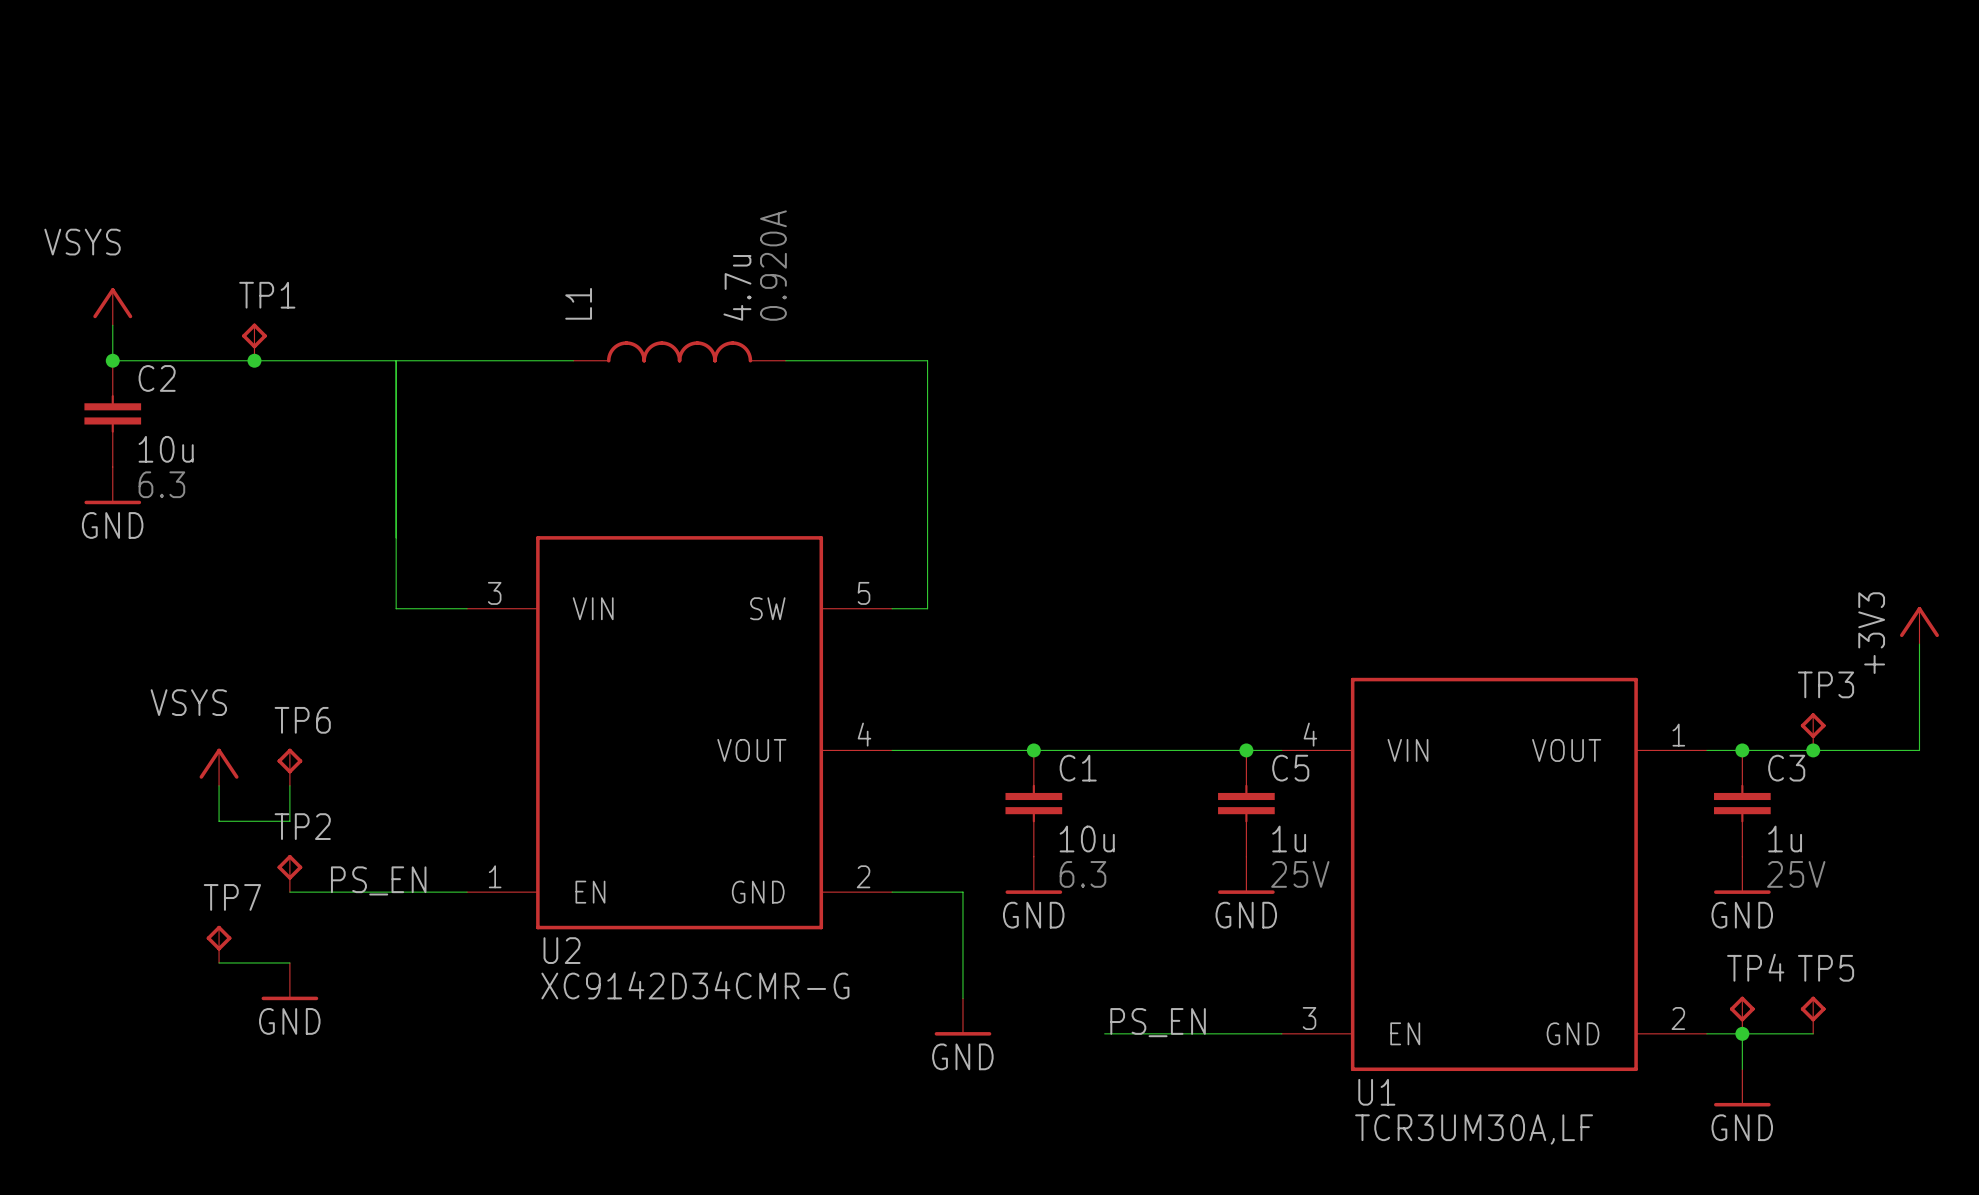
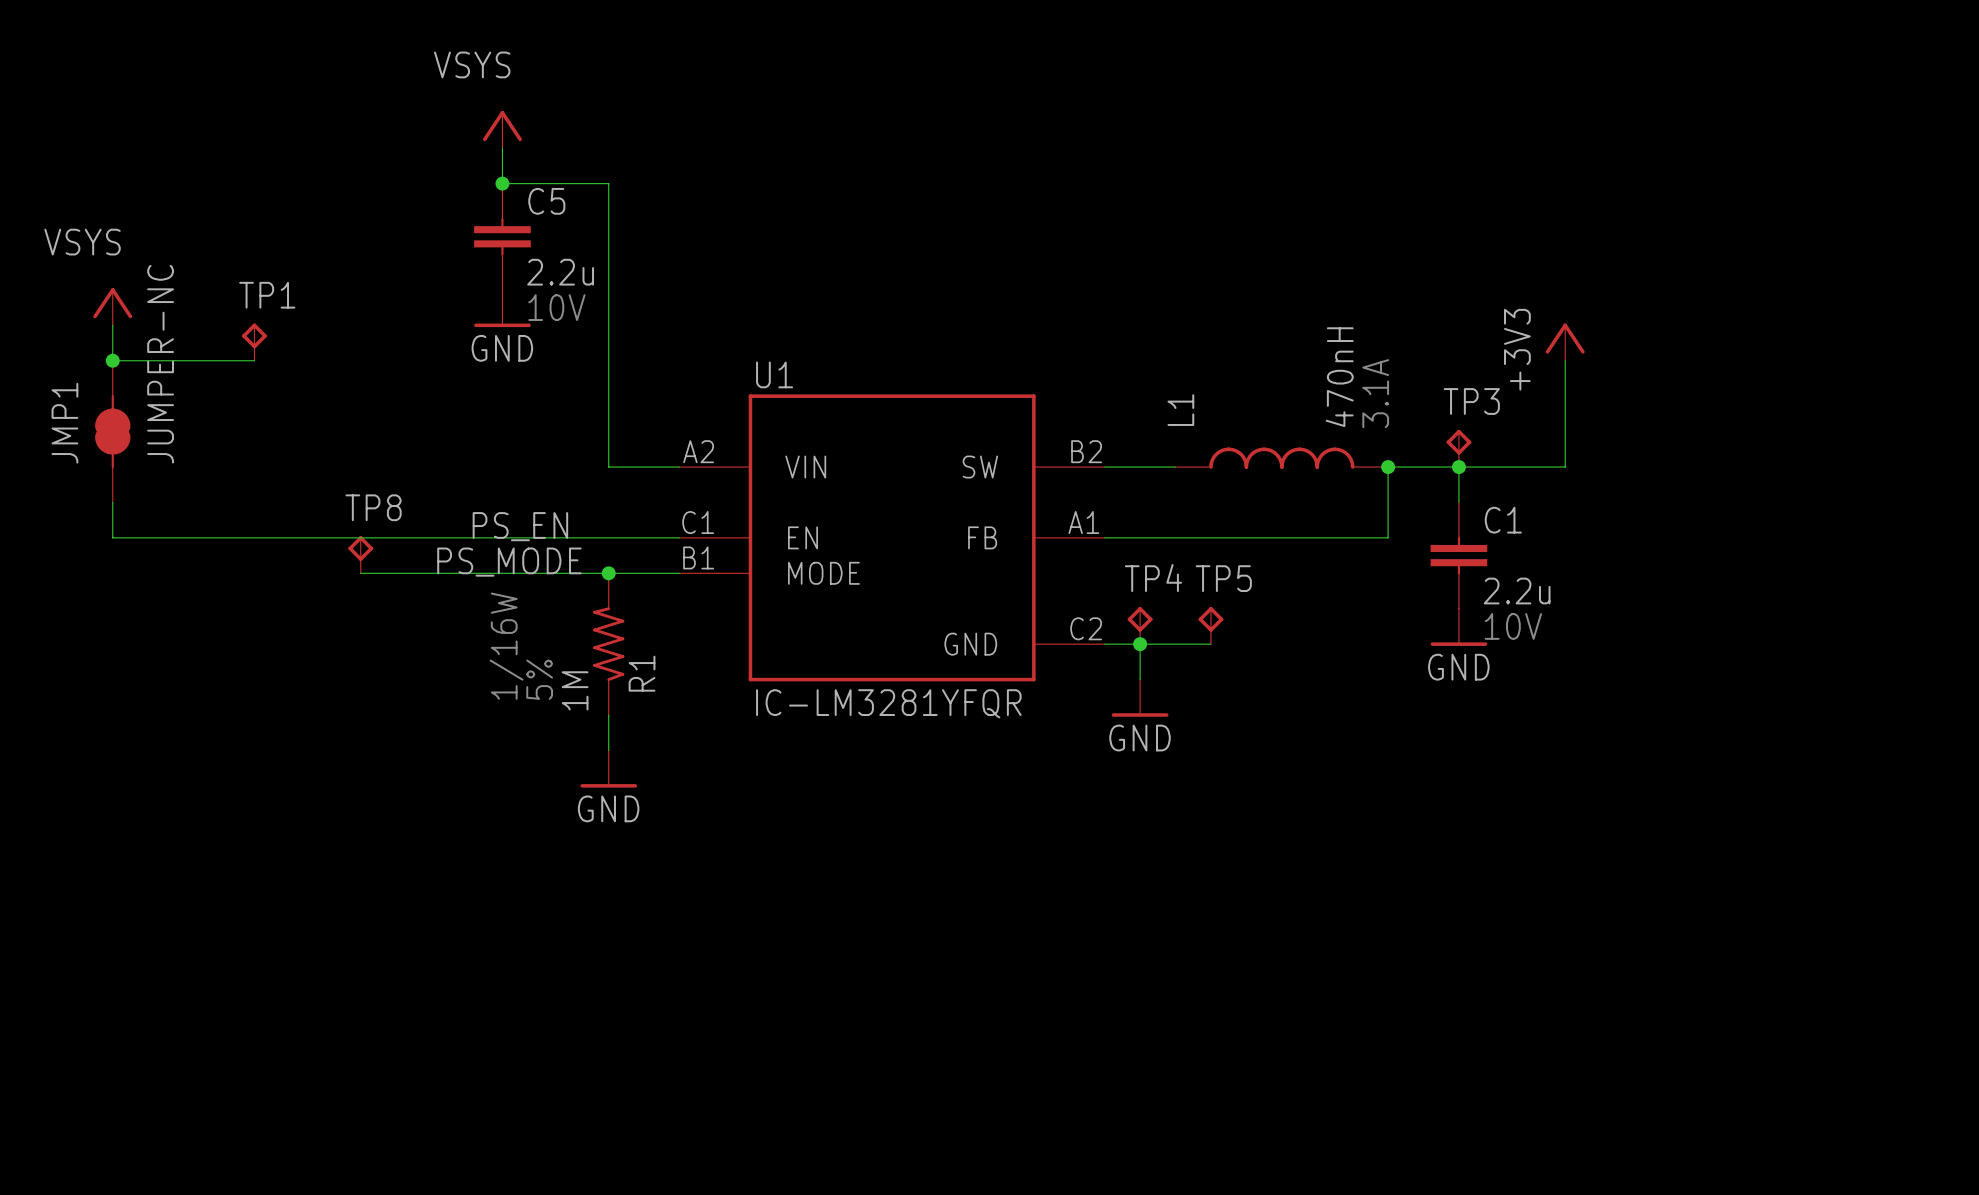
power symbol: none -> VSYS (502, 129)
wire: none -> (502, 148) (502, 183) (608, 183) (608, 467) (679, 467)
junction: none -> (502, 183)
L1 text: 0.920A (773, 265) -> 3.1A (1375, 393)
L1 value: 4.7u (737, 287) -> 470nH (1339, 377)
power symbol: none -> GND (502, 308)
power symbol: none -> +3V3 (1565, 342)
L1 position: (679, 351) -> (1281, 458)
wire: (254, 360) (573, 360) -> (360, 573) (679, 573)
junction: (254, 360) -> none
wire: (396, 360) (396, 608) (467, 608) -> none
wire: (785, 360) (927, 360) (927, 608) (892, 608) -> none
wire: none -> (1565, 360) (1565, 467) (1388, 467) (1388, 537) (1104, 537)
C2: 10u (112, 413) -> none
JMP1: none -> JUMPER-NC (112, 431)
wire: none -> (1104, 467) (1175, 467)
junction: none -> (1388, 467)
wire: none -> (1458, 467) (1458, 502)
junction: none -> (1458, 467)
power symbol: GND (112, 485) -> none
wire: none -> (112, 502) (112, 537) (679, 537)
label: none -> PS_EN (520, 526)
TP8: none -> (360, 554)
label: none -> PS_MODE (509, 562)
junction: none -> (608, 573)
power symbol: +3V3 (1919, 625) -> none
power symbol: none -> GND (1458, 627)
R1: none -> 1M (608, 644)
wire: none -> (1104, 644) (1210, 644)
wire: none -> (1140, 644) (1140, 679)
junction: none -> (1140, 644)
wire: (1919, 644) (1919, 750) (1706, 750) -> none
U1 symbol: [1281, 677, 1707, 1072] -> [679, 394, 1105, 682]
power symbol: none -> GND (1140, 698)
U1 value: none -> IC-LM3281YFQR (888, 703)
wire: none -> (608, 715) (608, 750)
TP3 position: (1813, 731) -> (1458, 448)
U2: (679, 732) -> none
wire: (892, 750) (1281, 750) -> none
junction: (1033, 750) -> none
junction: (1246, 750) -> none
junction: (1742, 750) -> none
junction: (1813, 750) -> none
power symbol: VSYS (219, 767) -> none
TP6: (289, 767) -> none
power symbol: none -> GND (608, 769)
wire: (219, 785) (219, 821) (289, 821) (289, 785) -> none
C1 position: (1033, 803) -> (1458, 555)
C5 position: (1246, 803) -> (502, 236)
C3: 1u (1742, 803) -> none
C1 value: 10u (1087, 838) -> 2.2u (1517, 591)
C5 value: 1u (1289, 838) -> 2.2u (560, 272)
TP2: (289, 873) -> none
C1 text: 6.3 (1082, 874) -> 10V (1513, 626)
C5 text: 25V (1300, 874) -> 10V (556, 307)
power symbol: GND (1033, 875) -> none
power symbol: GND (1246, 875) -> none
power symbol: GND (1742, 875) -> none
label: PS_EN (378, 880) -> none
wire: (289, 892) (467, 892) -> none
wire: (892, 892) (962, 892) (962, 998) -> none
TP7: (219, 944) -> none
wire: (219, 962) (289, 962) -> none
power symbol: GND (289, 981) -> none
TP4 position: (1742, 1015) -> (1140, 625)
TP5 position: (1813, 1015) -> (1210, 625)
power symbol: GND (962, 1017) -> none
label: PS_EN (1158, 1022) -> none
wire: (1104, 1033) (1281, 1033) -> none
wire: (1706, 1033) (1813, 1033) -> none
wire: (1742, 1033) (1742, 1069) -> none
junction: (1742, 1033) -> none
power symbol: GND (1742, 1087) -> none
U1 name position: U1 (1376, 1092) -> U1 (774, 374)
U1 text: TCR3UM30A,LF (1474, 1129) -> none

